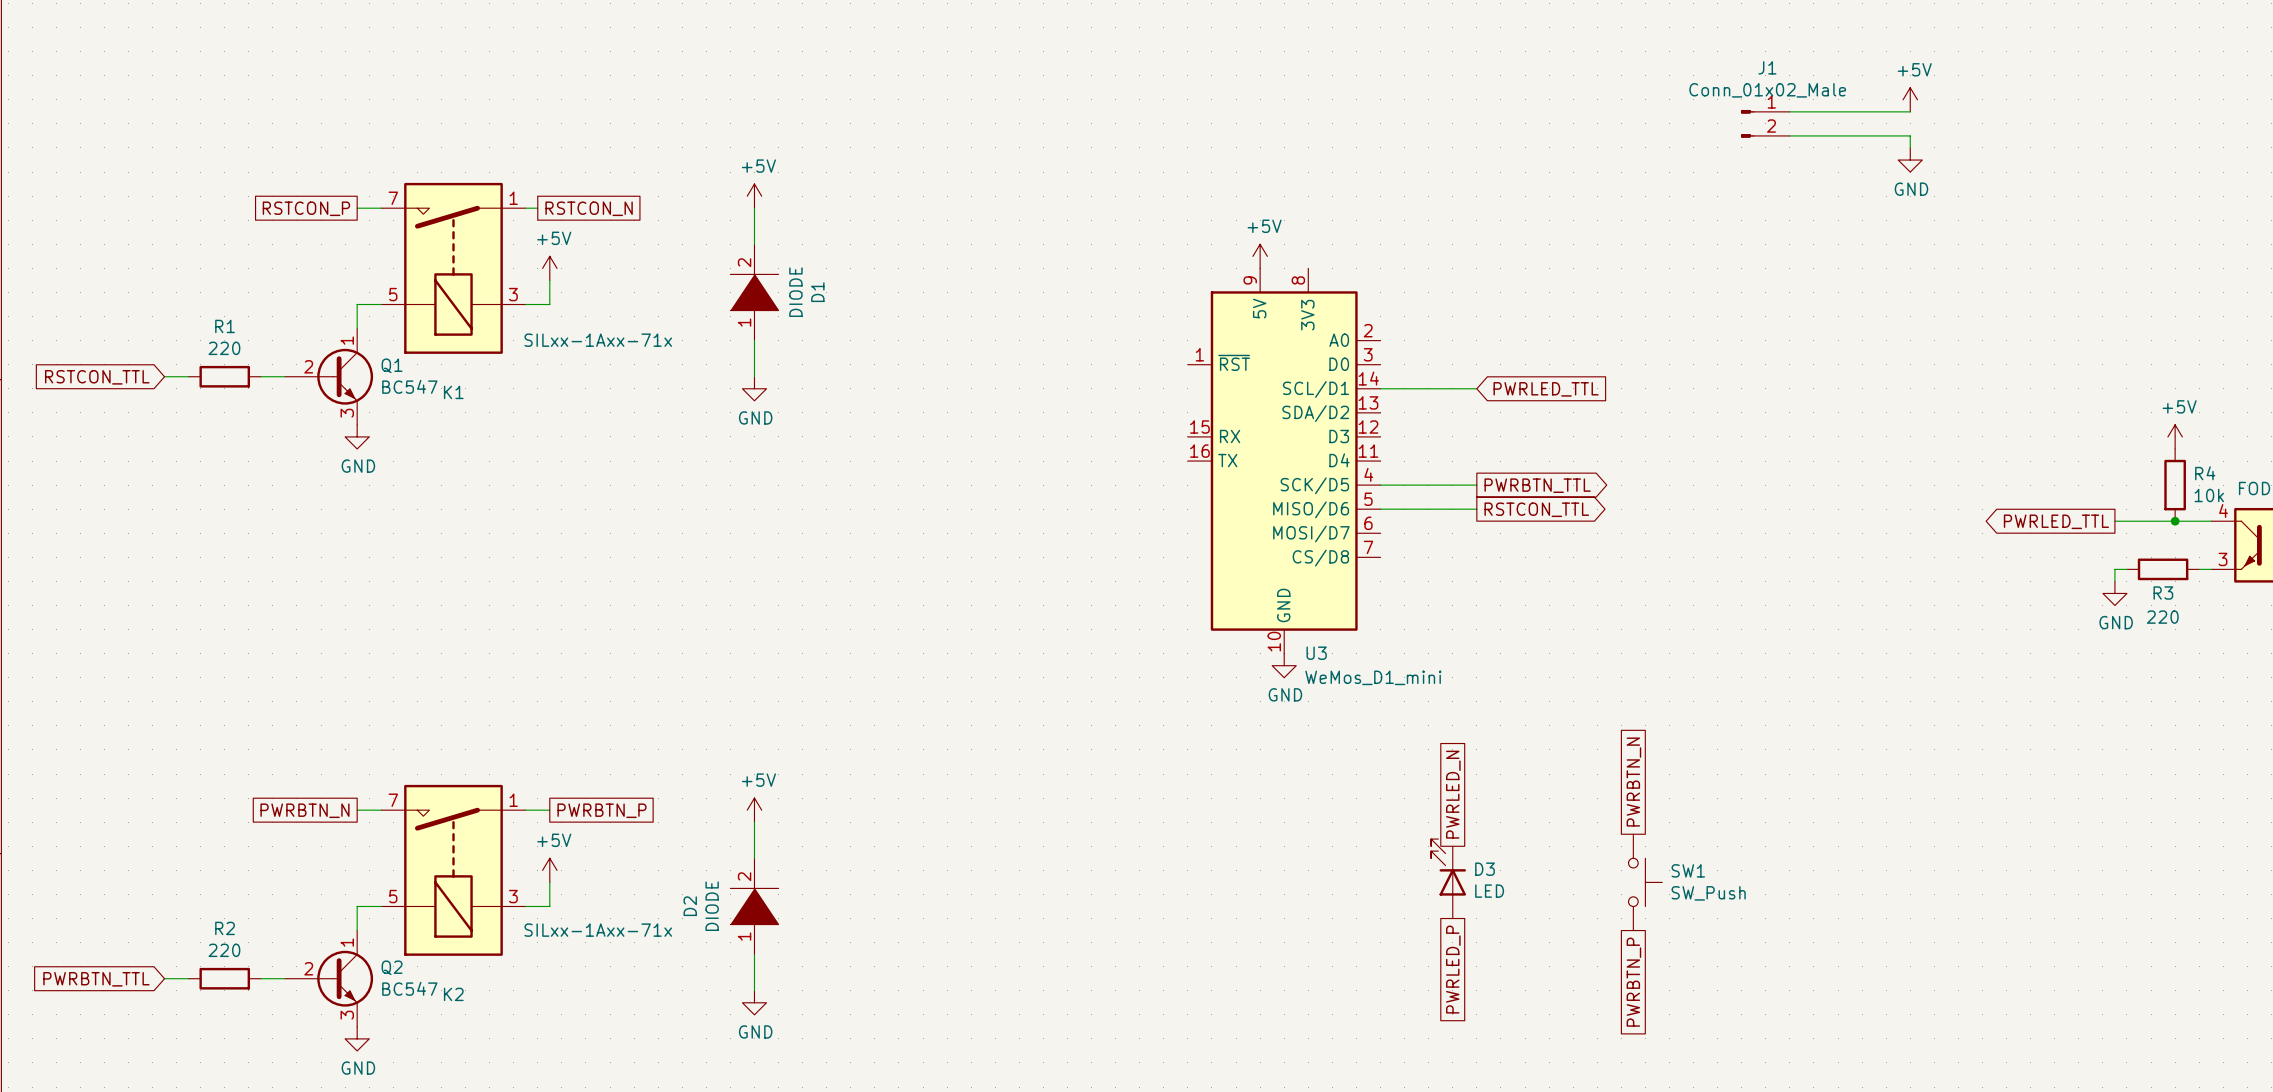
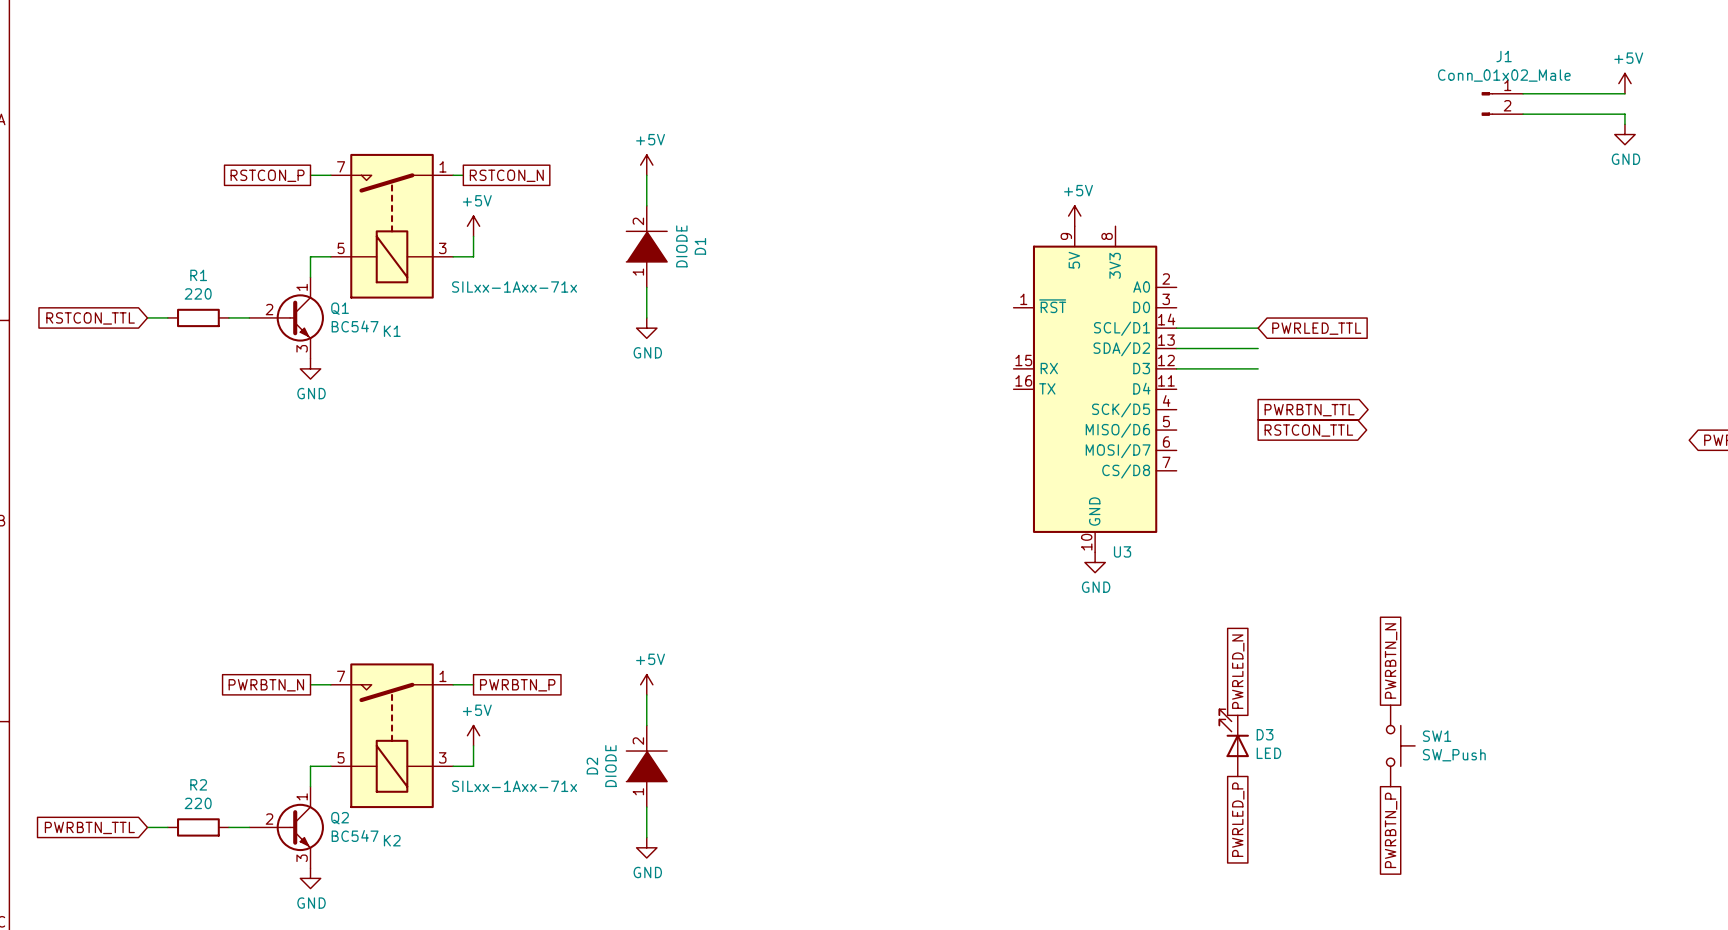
wire: (1380, 485) (1476, 485) -> (1176, 348) (1258, 348)
wire: (1380, 509) (1476, 509) -> (1176, 368) (1258, 368)
U3 value: WeMos_D1_mini (1373, 677) -> none

